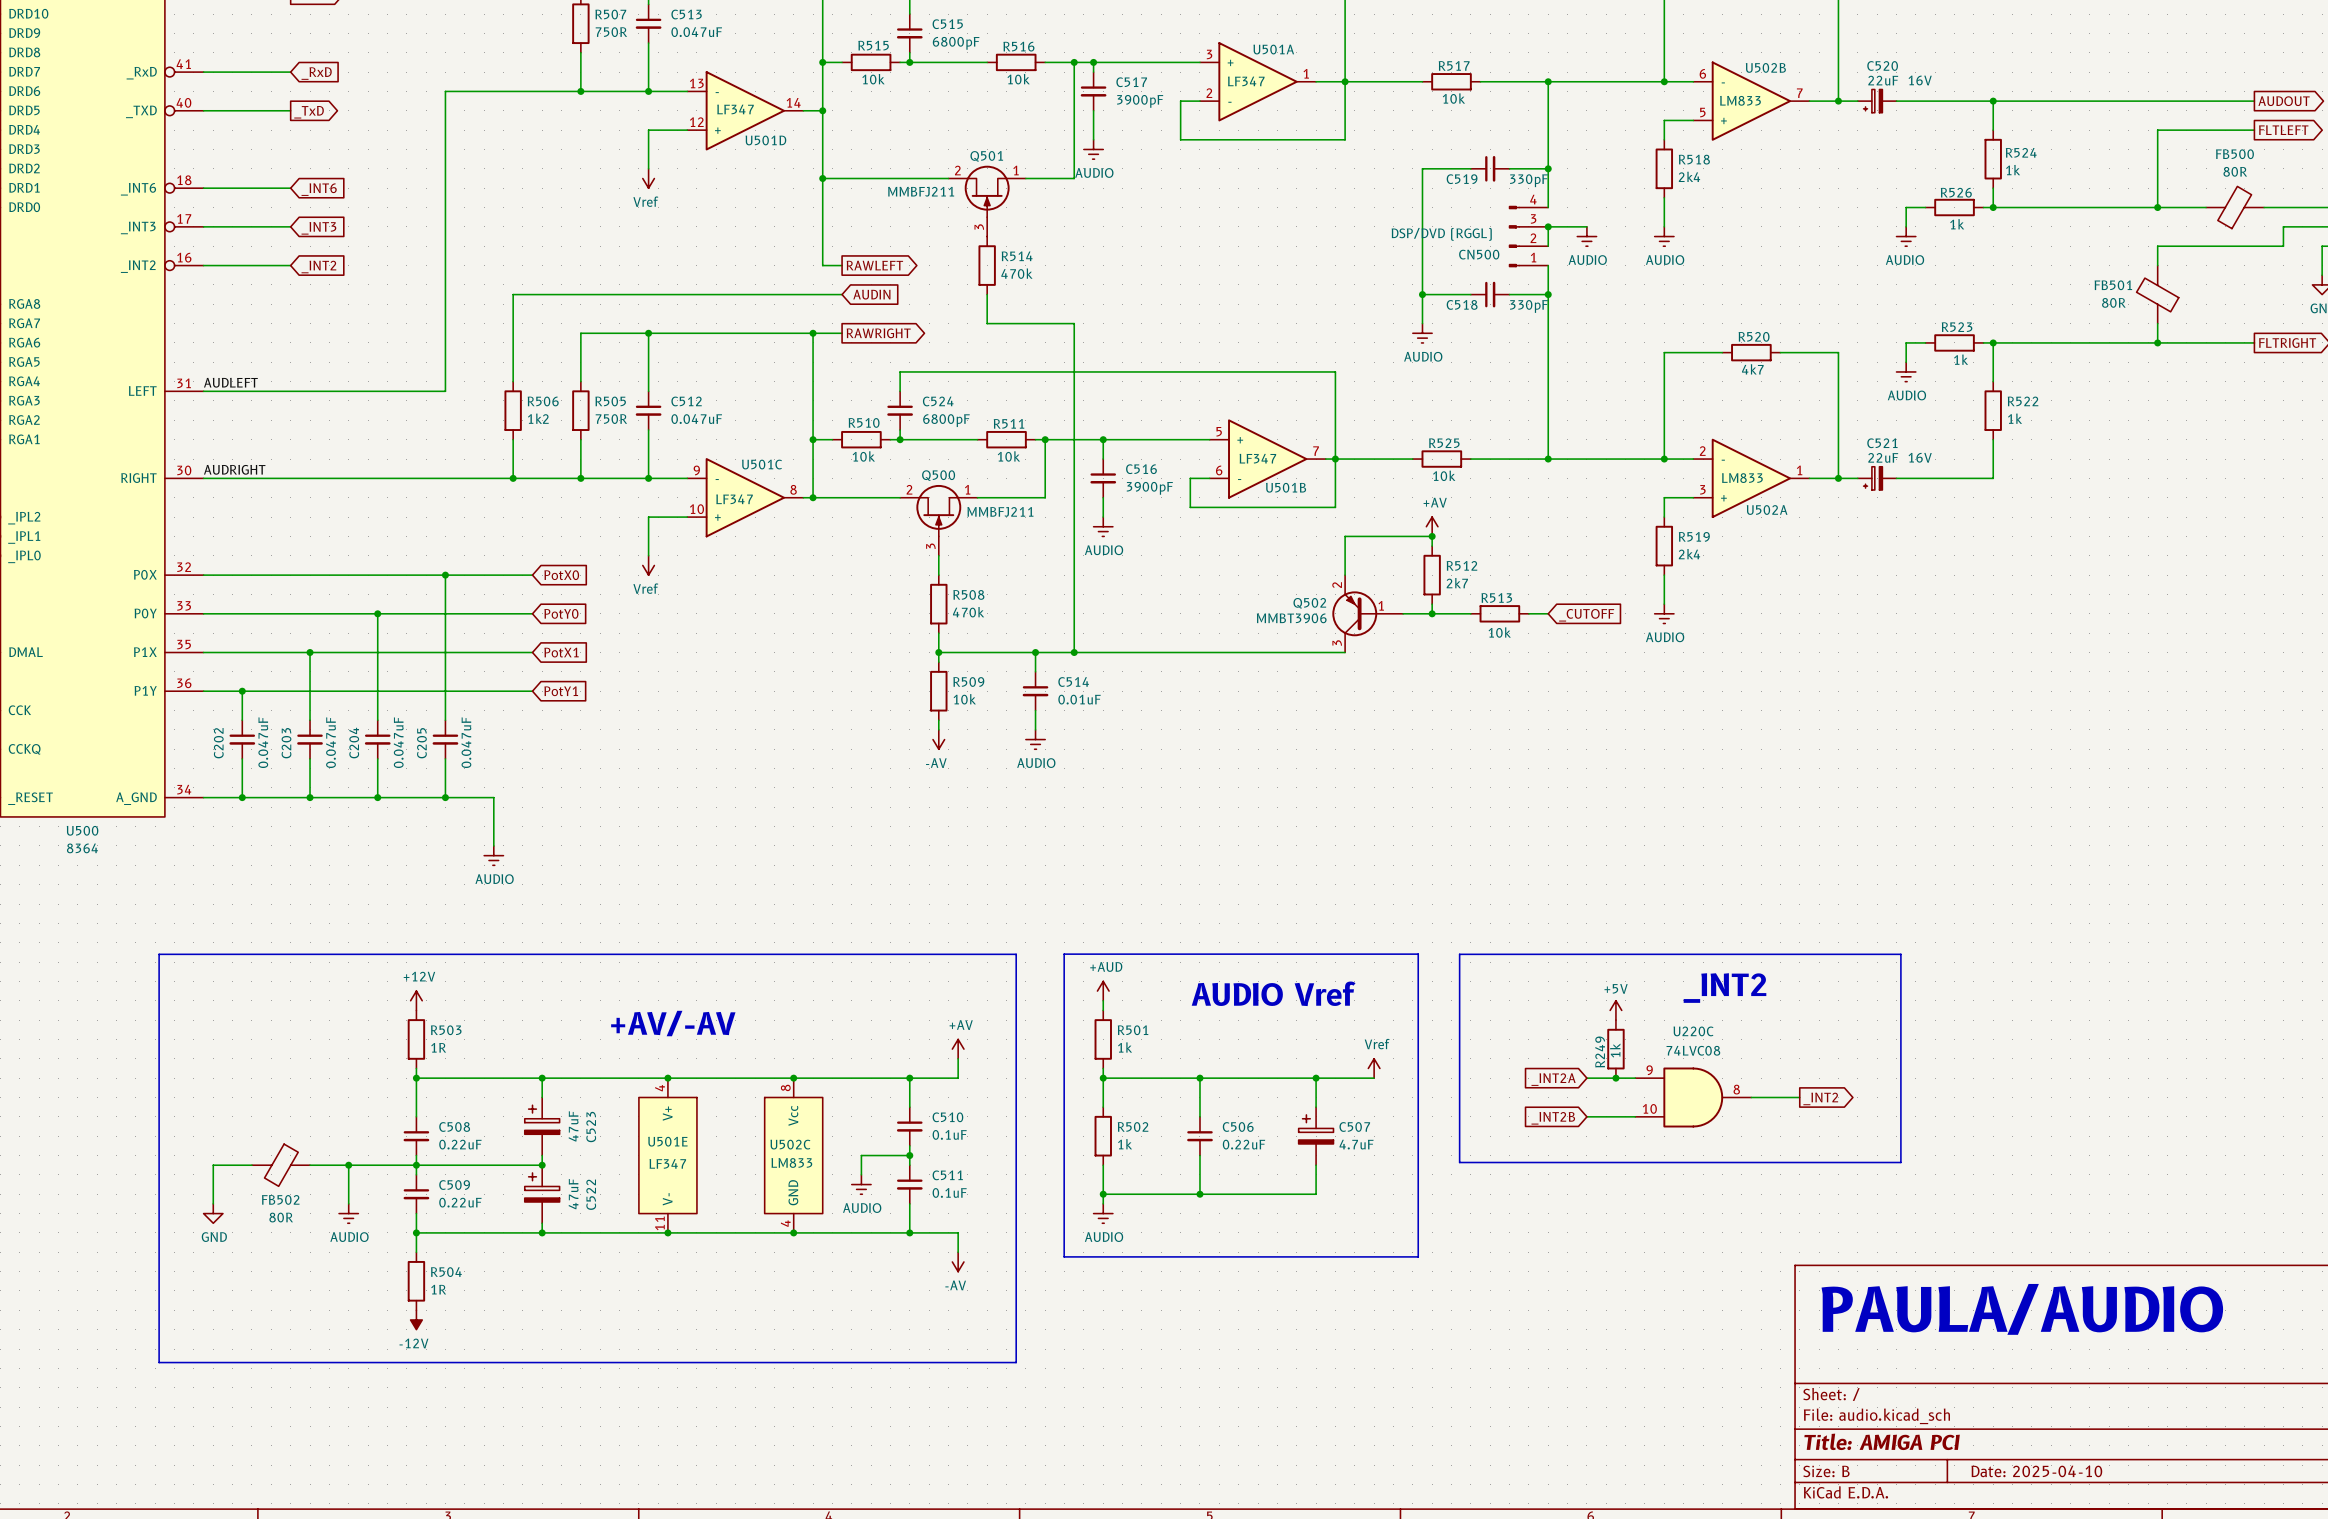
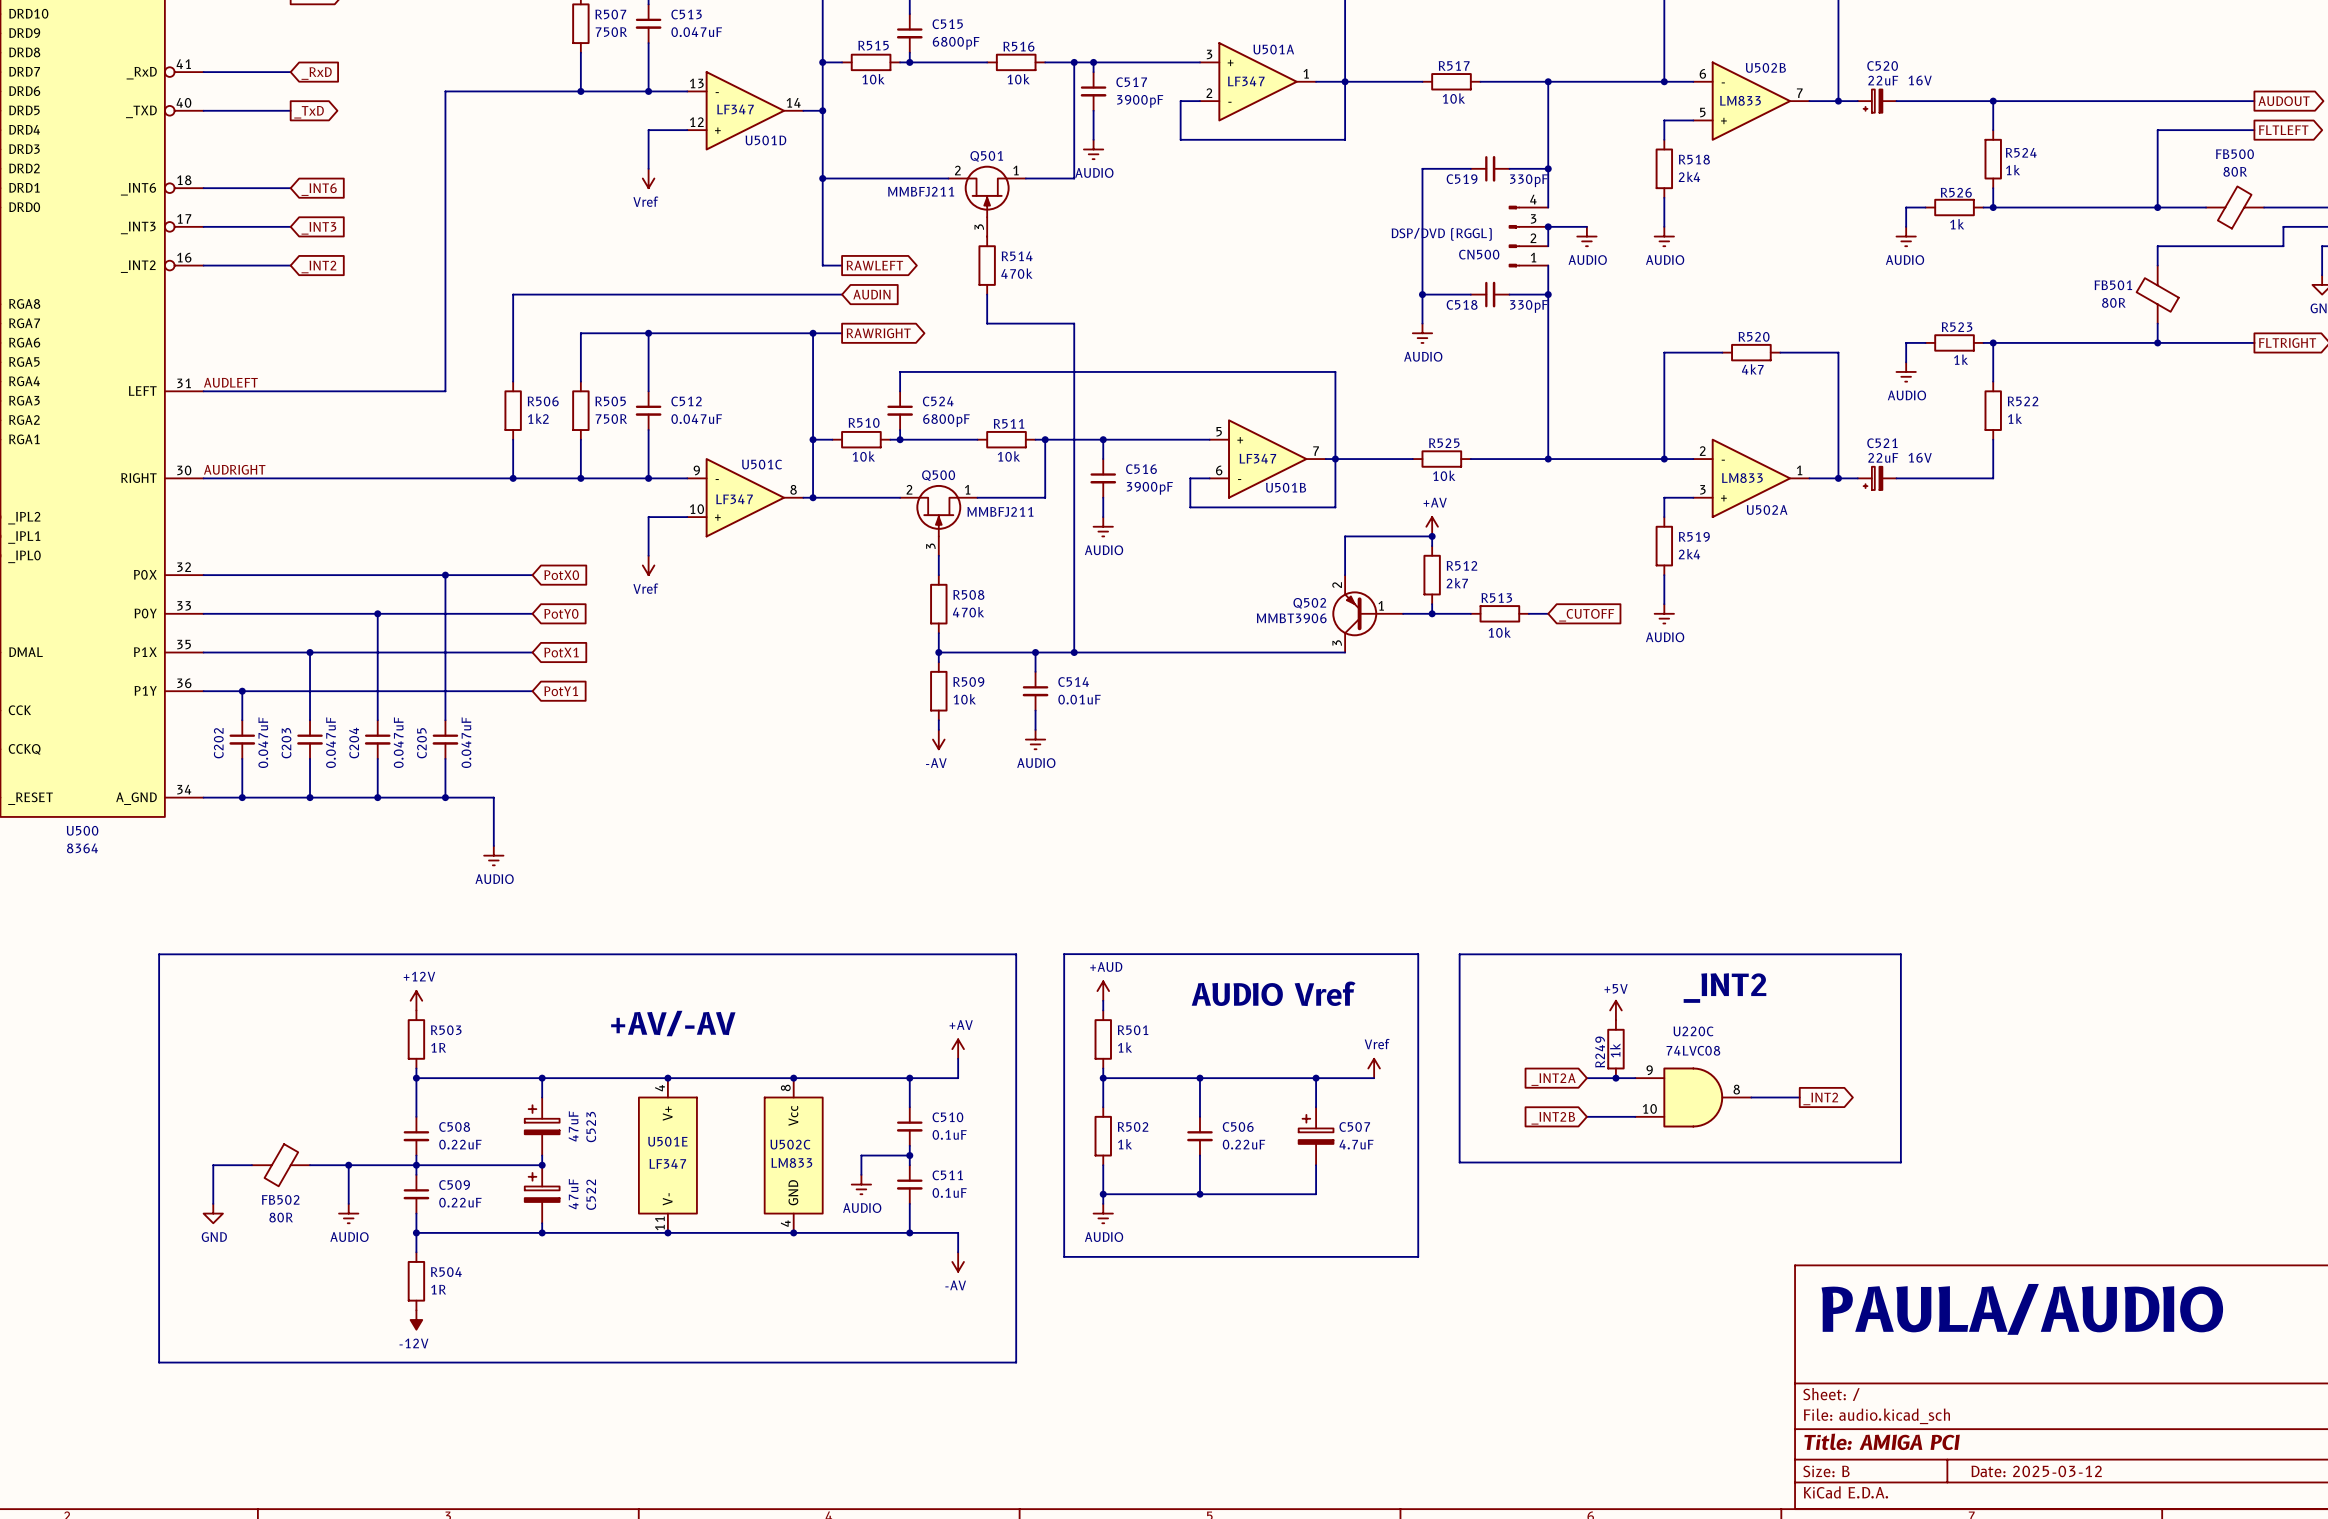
title block: Date: 2025-04-10 (2036, 1471) -> Date: 2025-03-12 (2036, 1471)

